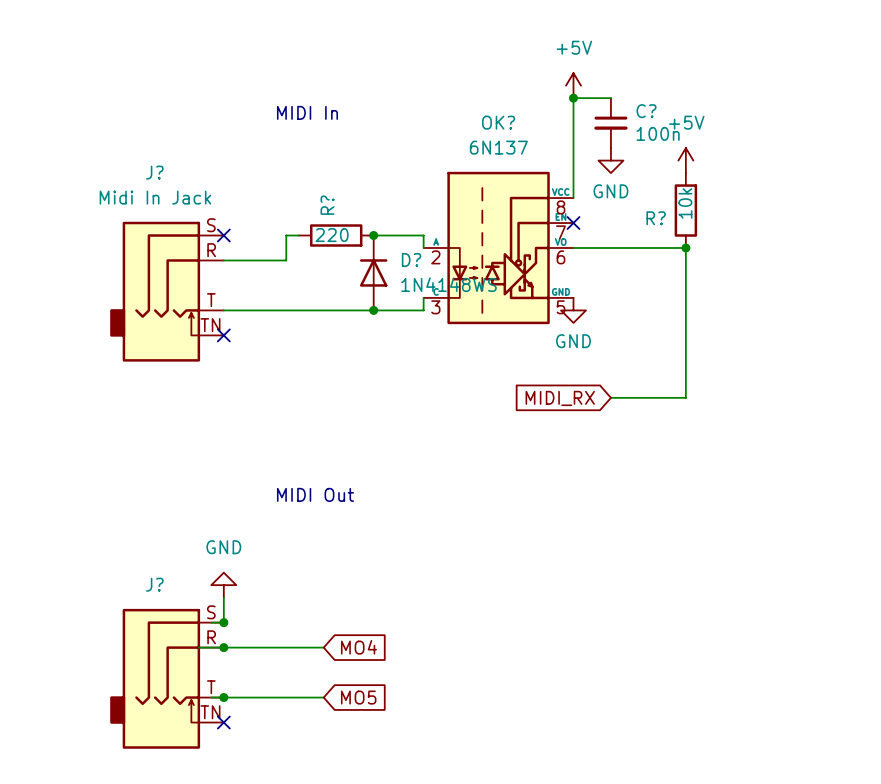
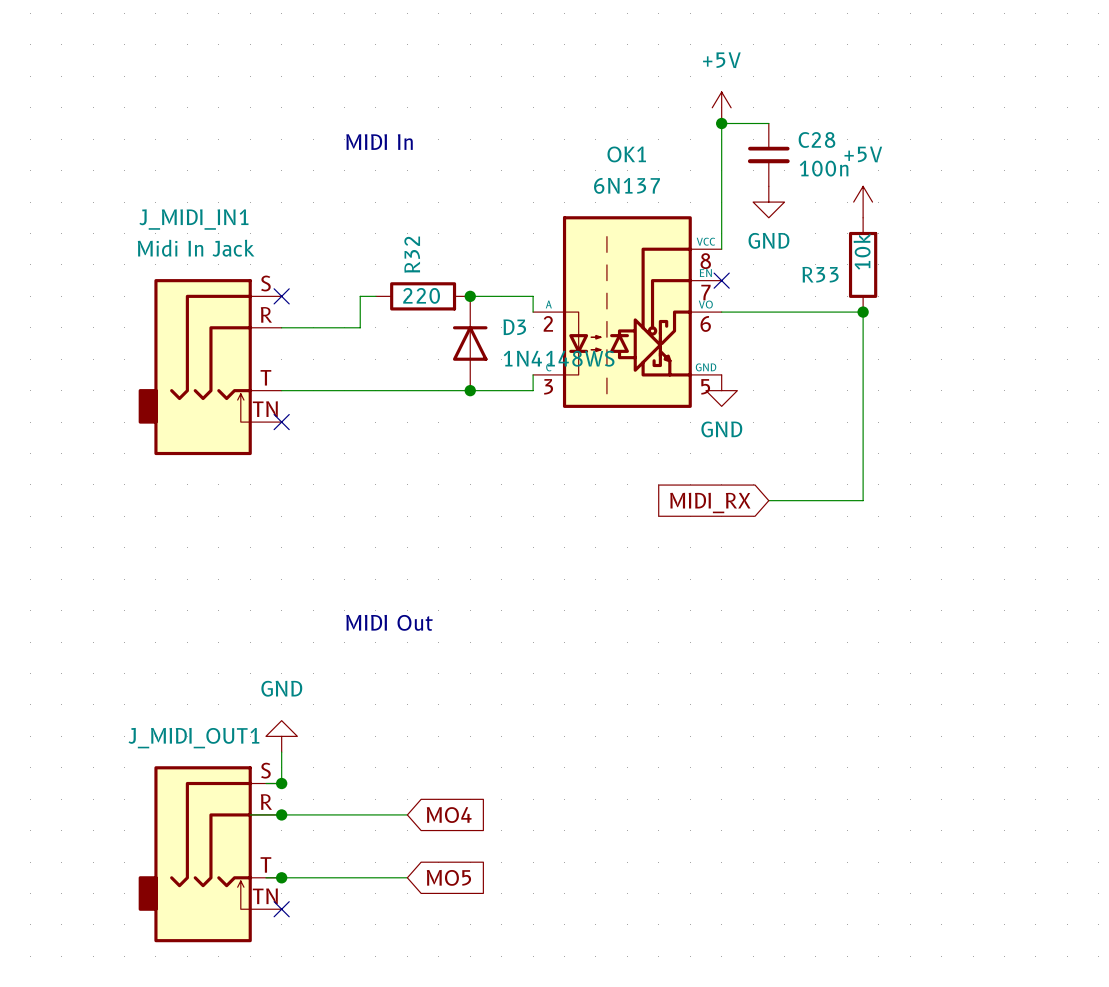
C? name: C? (646, 111) -> C28 (816, 139)
OK? name: OK? (498, 122) -> OK1 (626, 154)
J? name: J? (154, 172) -> J_MIDI_IN1 (193, 219)
R? name: R? (327, 205) -> R32 (412, 254)
R? name: R? (656, 218) -> R33 (820, 274)
D? name: D? (411, 260) -> D3 (514, 327)
J? name: J? (154, 584) -> J_MIDI_OUT1 (193, 738)

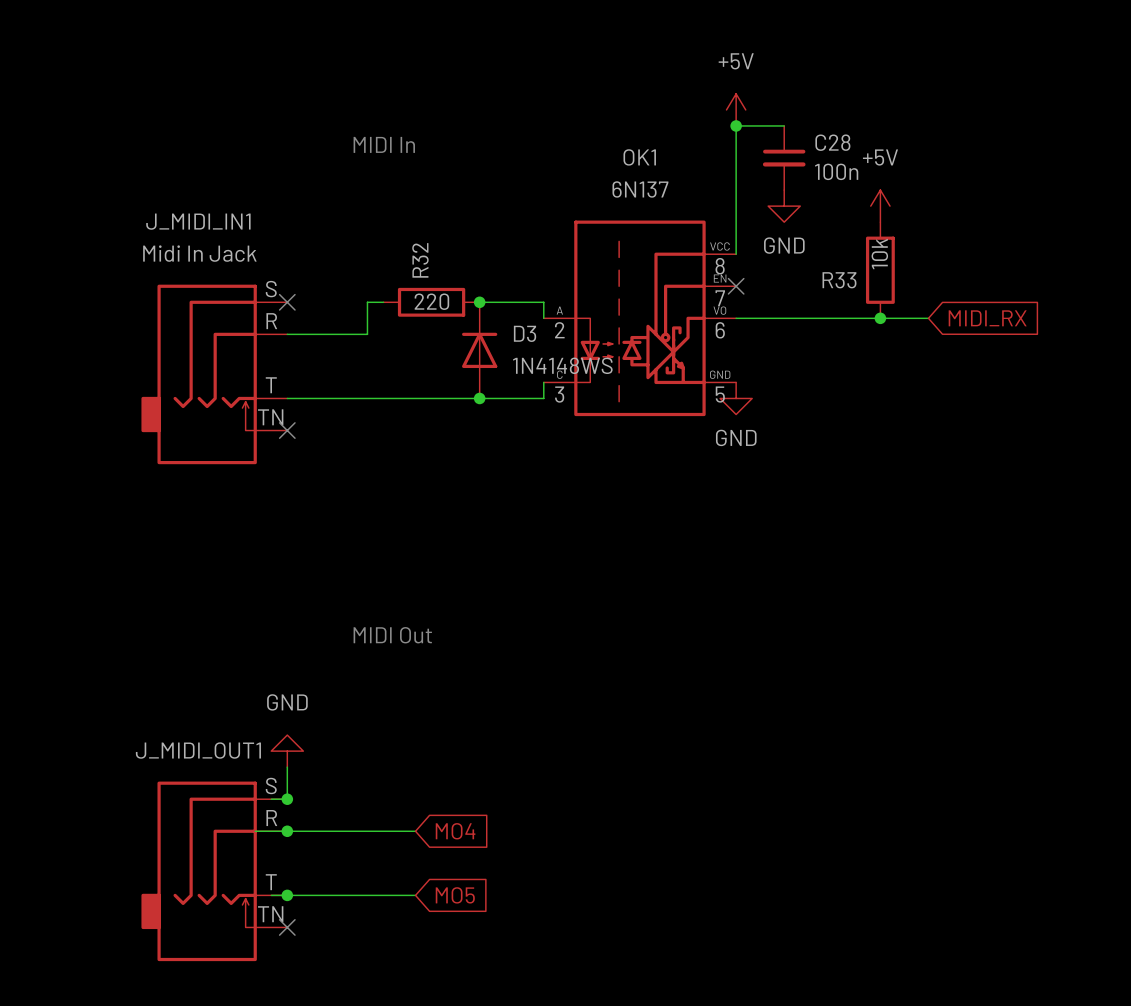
wire: (863, 312) (863, 500) (768, 500) -> (880, 318) (928, 318)
global label rotation: 0° (710, 503) -> 180° (987, 318)
global label position: MIDI_RX (710, 503) -> MIDI_RX (987, 318)

